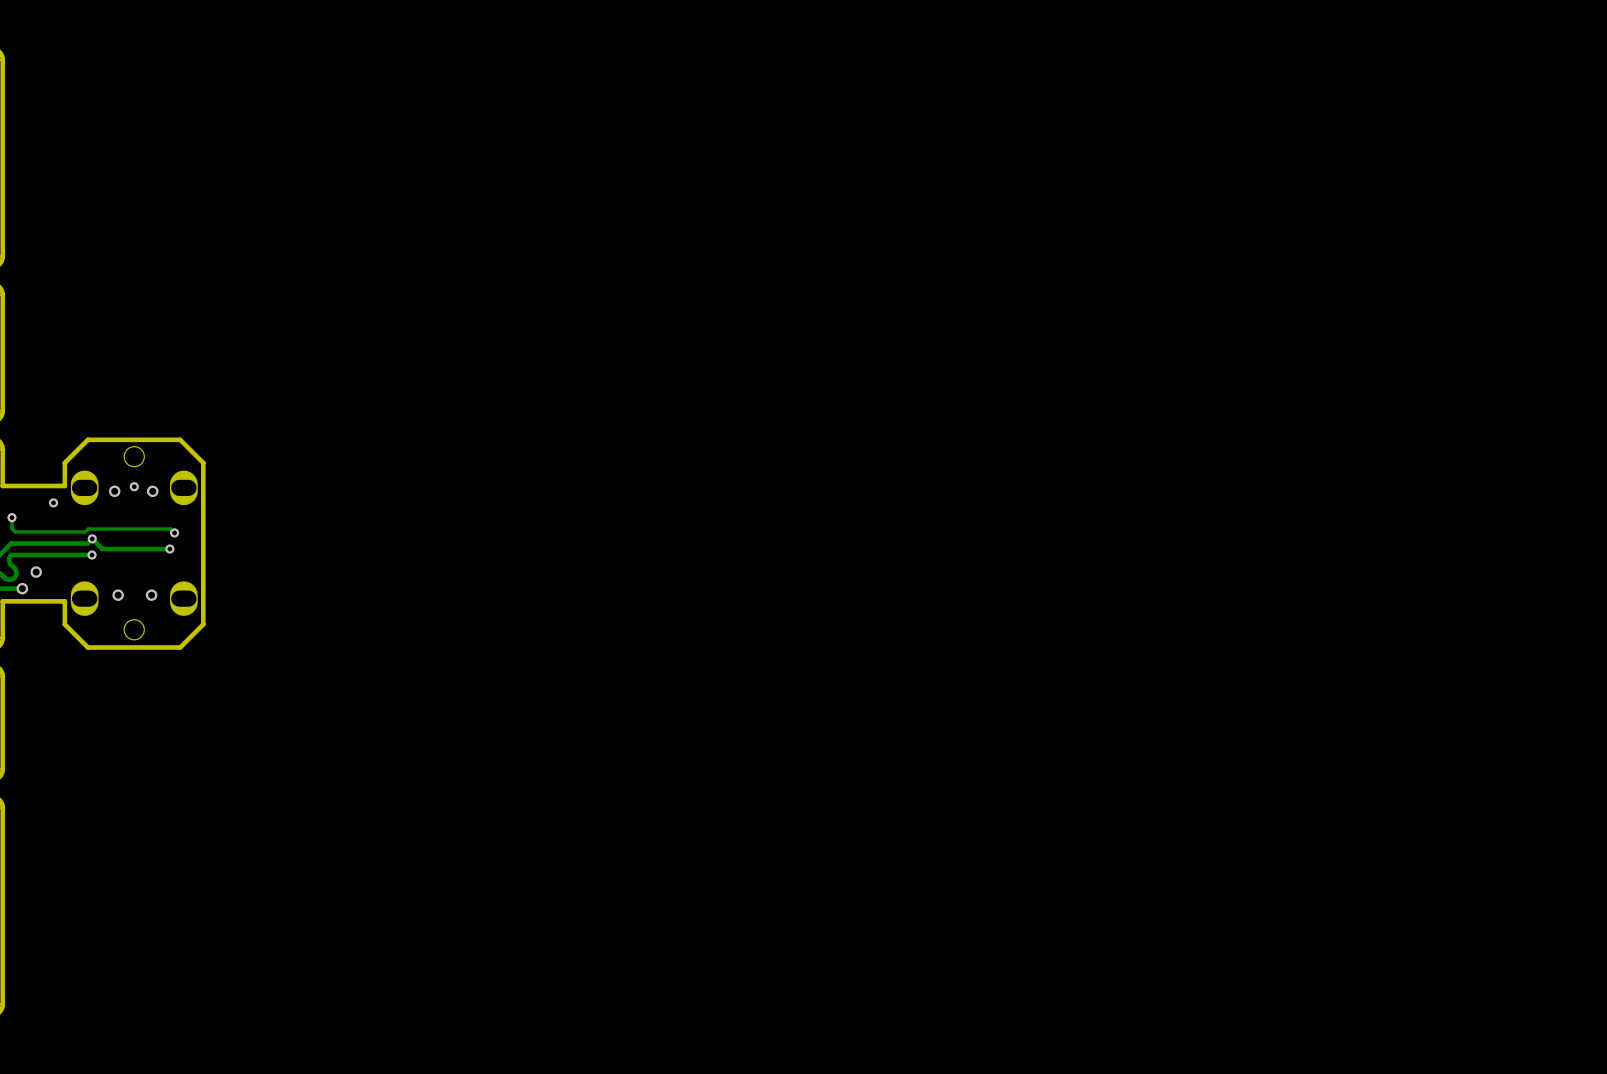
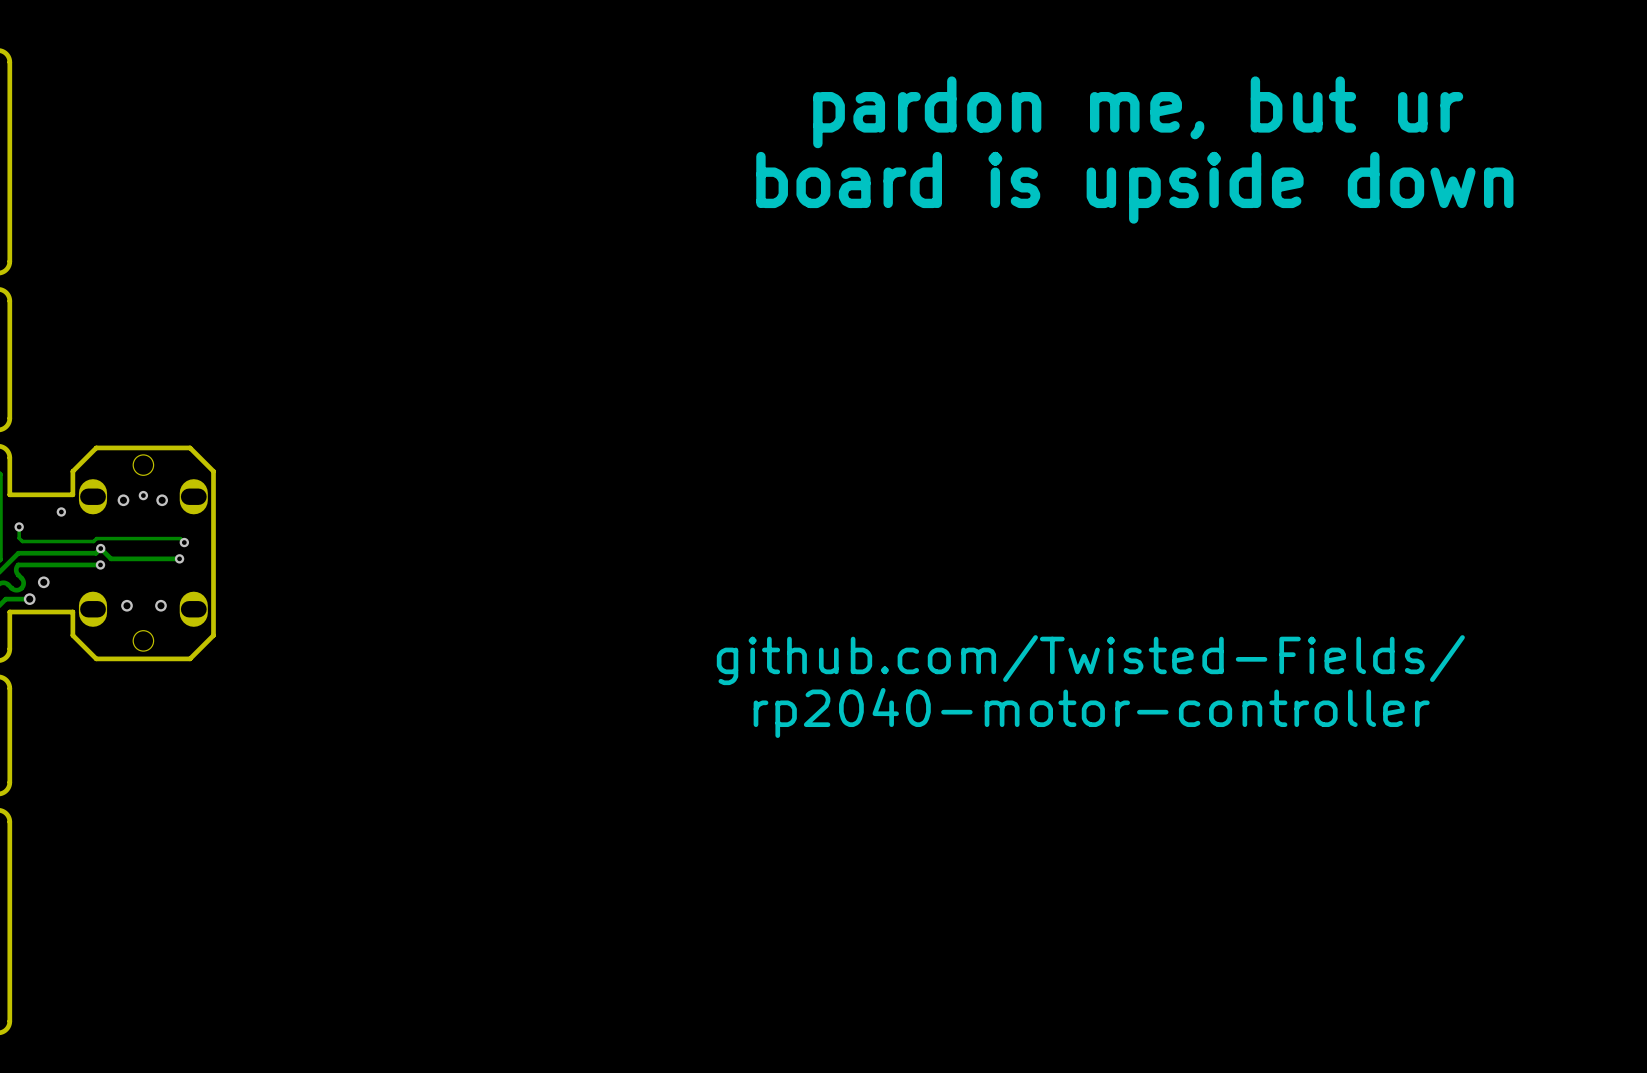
text: none -> pardon me, but ur (1138, 112)
text: none -> board is upside down (1134, 187)
text: none -> github.com/Twisted-Fields/ (1090, 660)
text: none -> rp2040-motor-controller (1091, 712)

